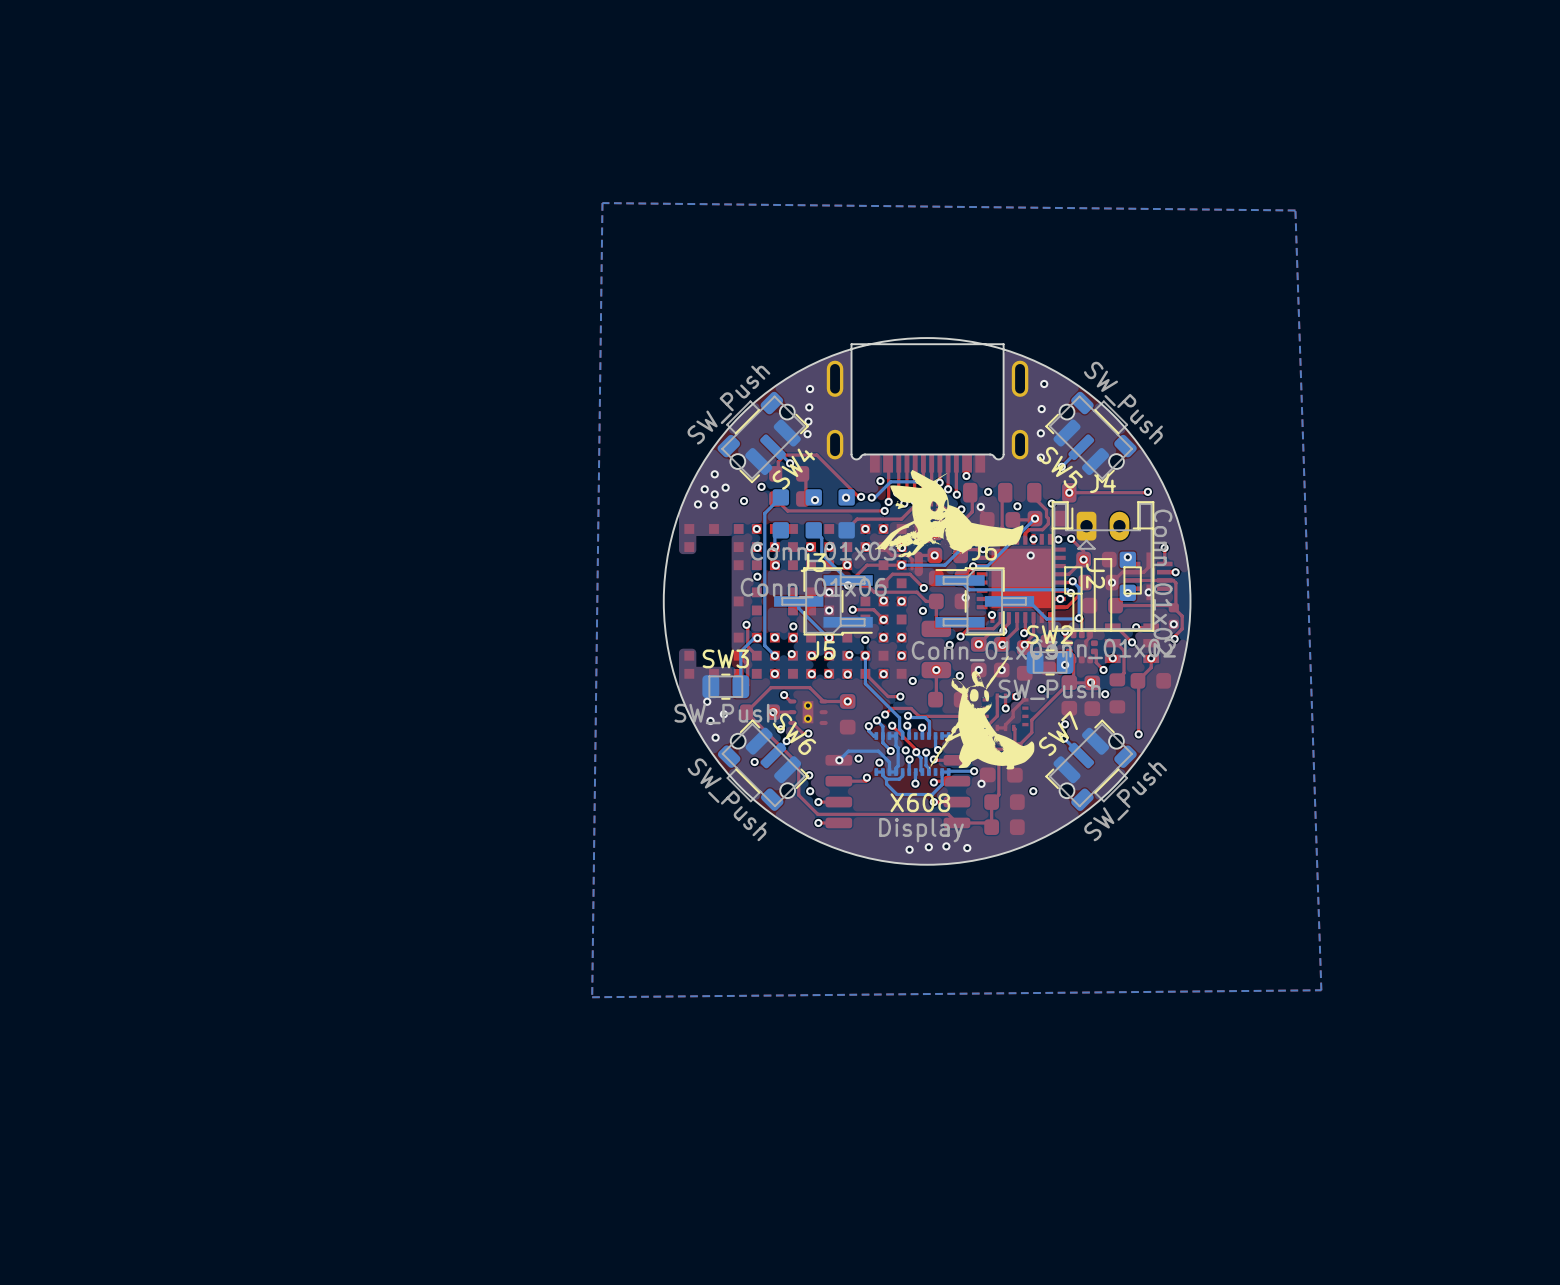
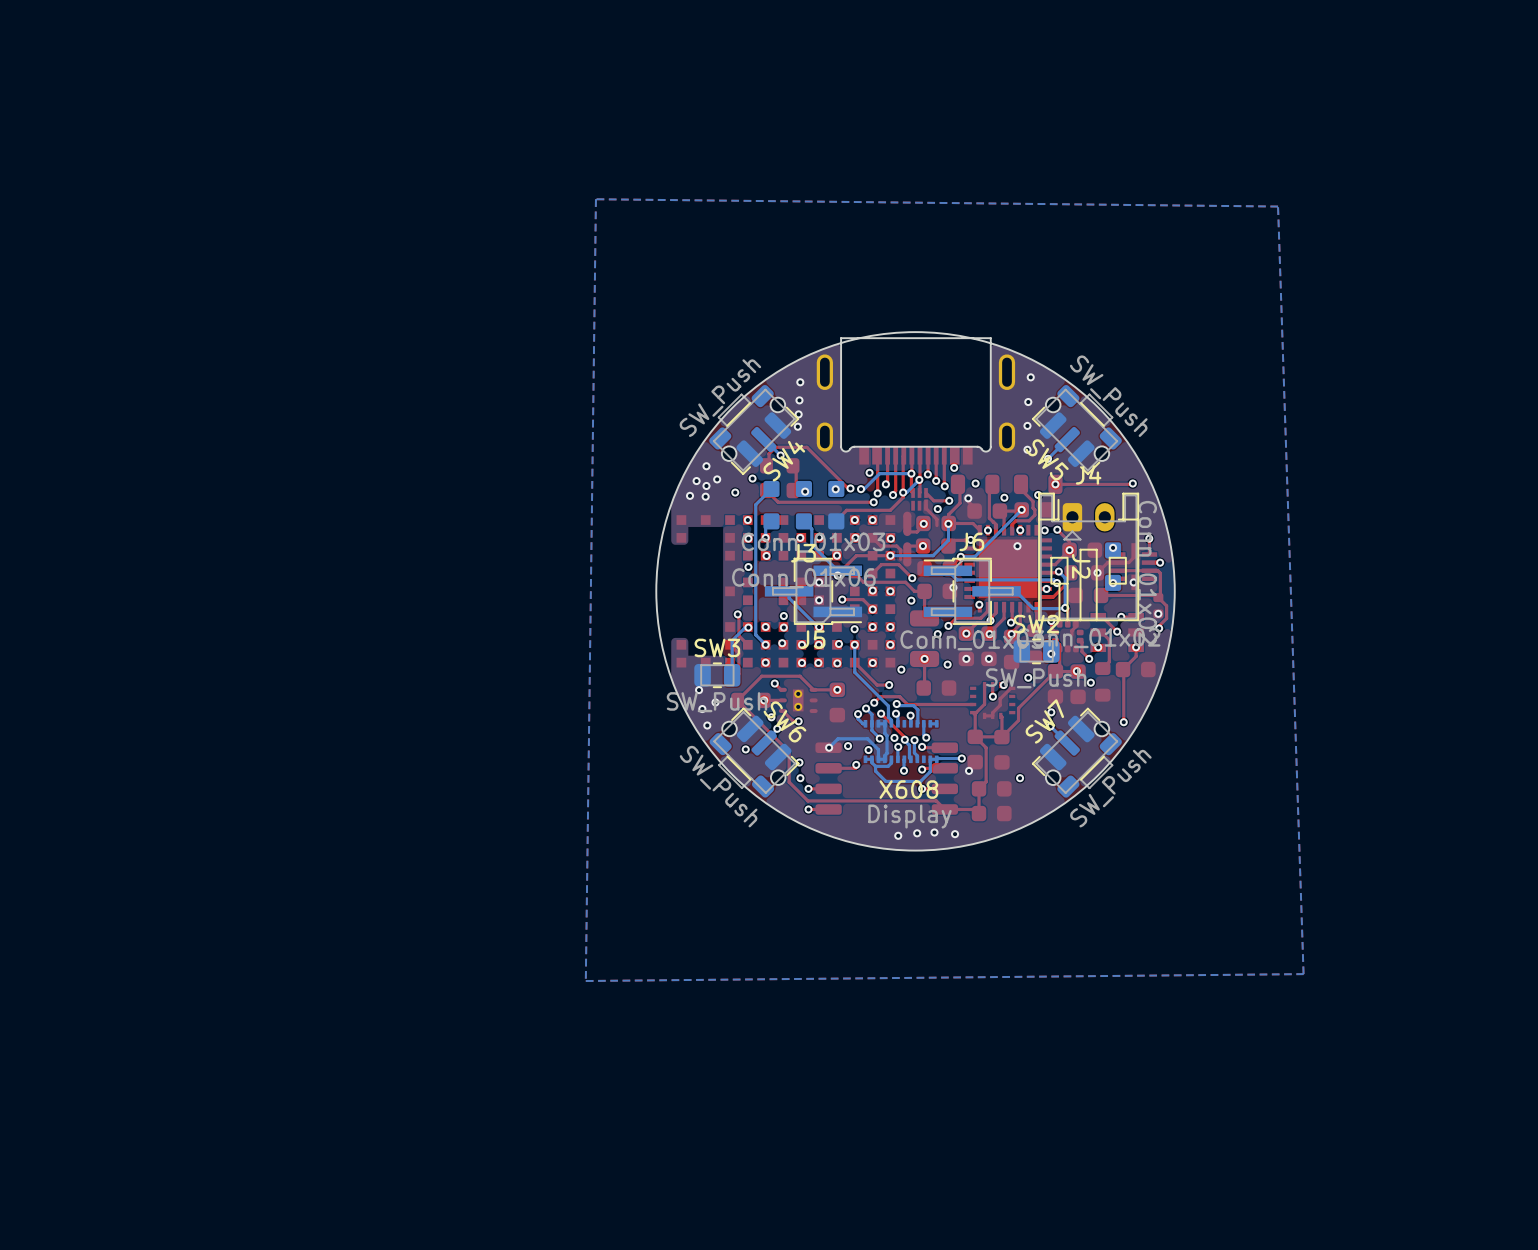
drawing: [874, 469, 1024, 558] -> none
drawing: [929, 655, 1035, 770] -> none

